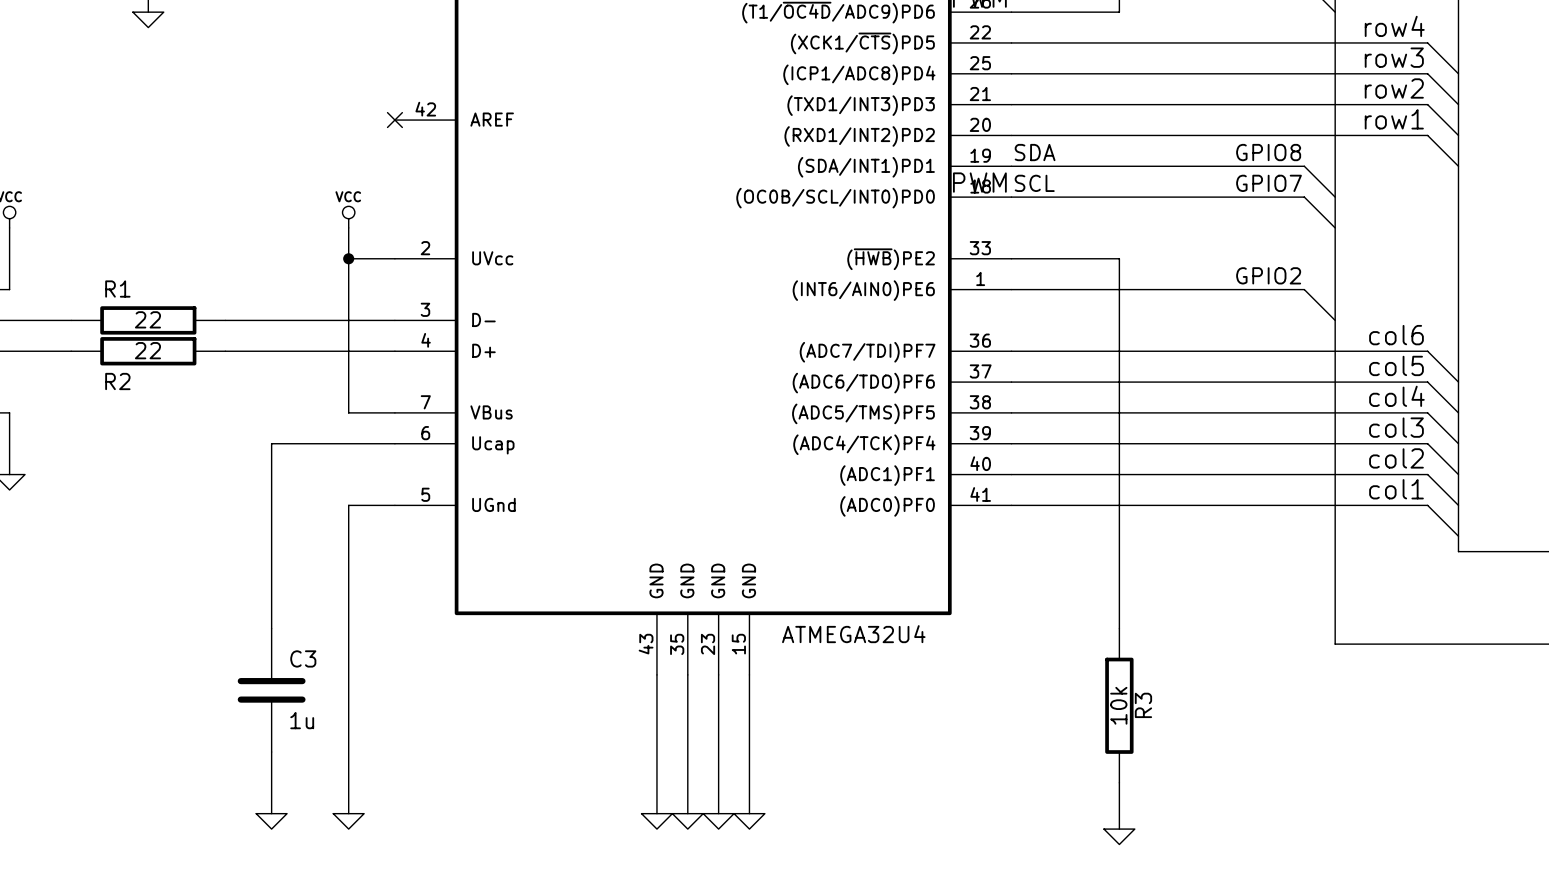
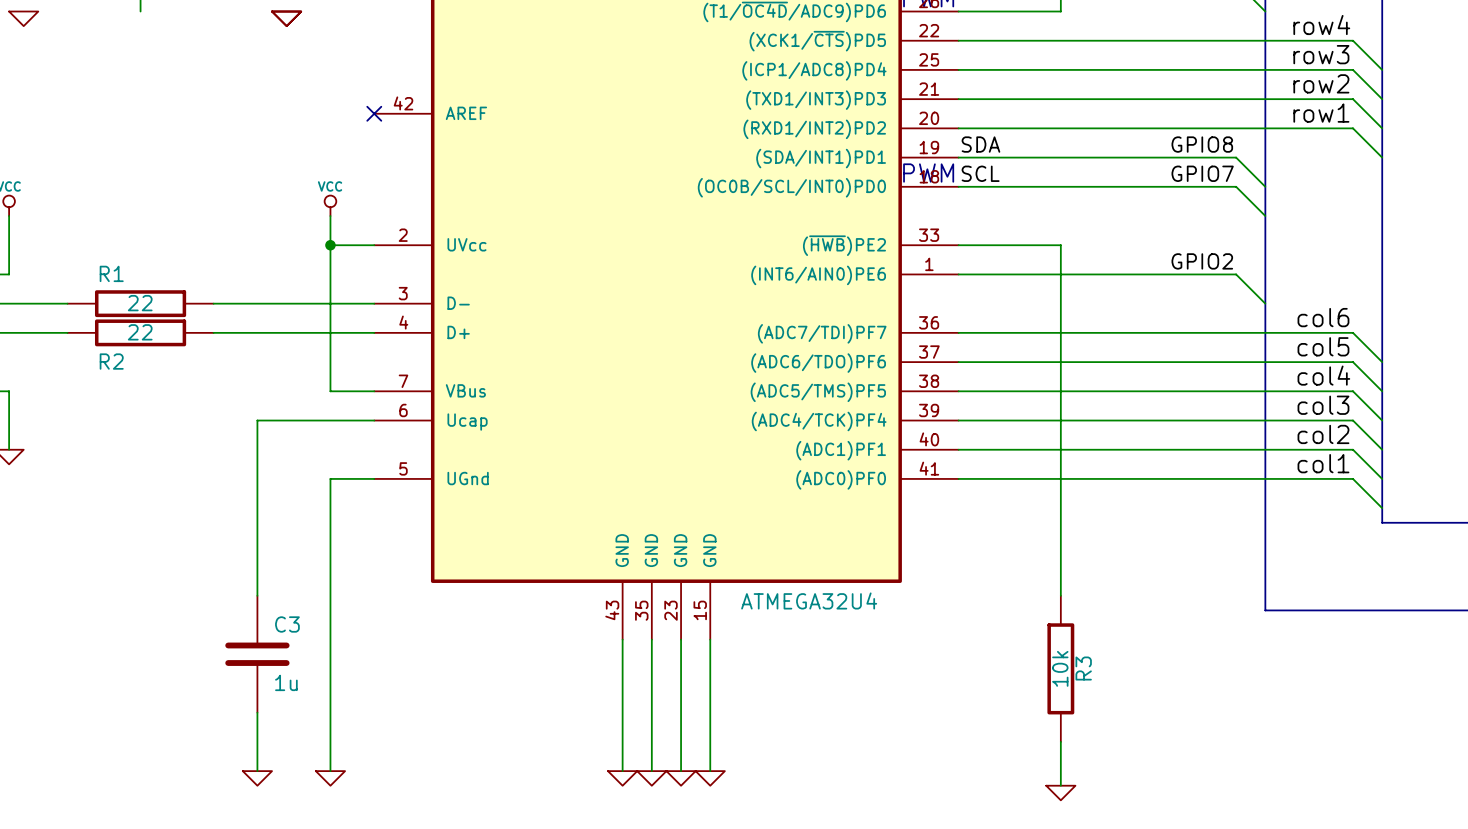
power symbol: none -> (23, 18)
power symbol: (148, 19) -> none
power symbol: none -> (286, 18)

